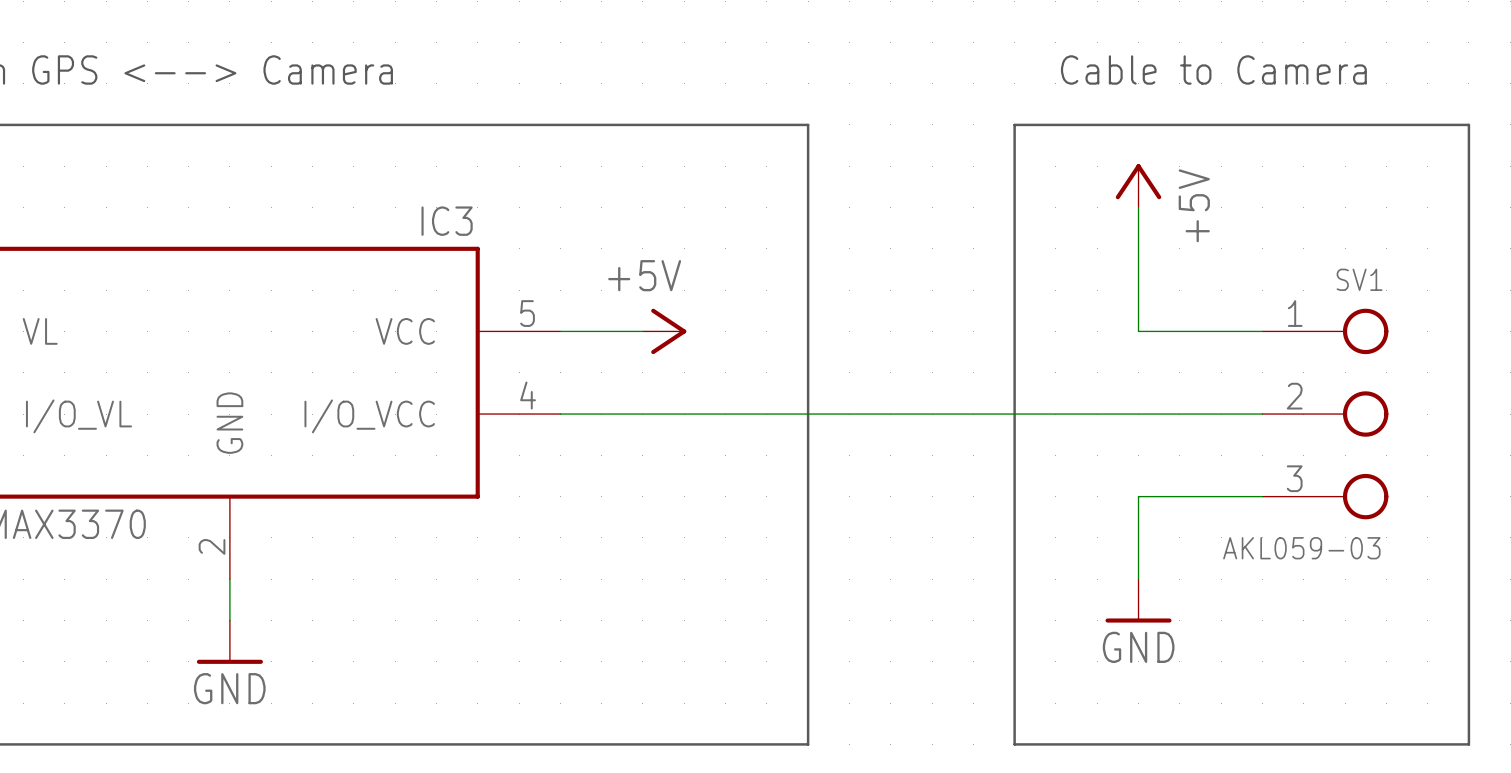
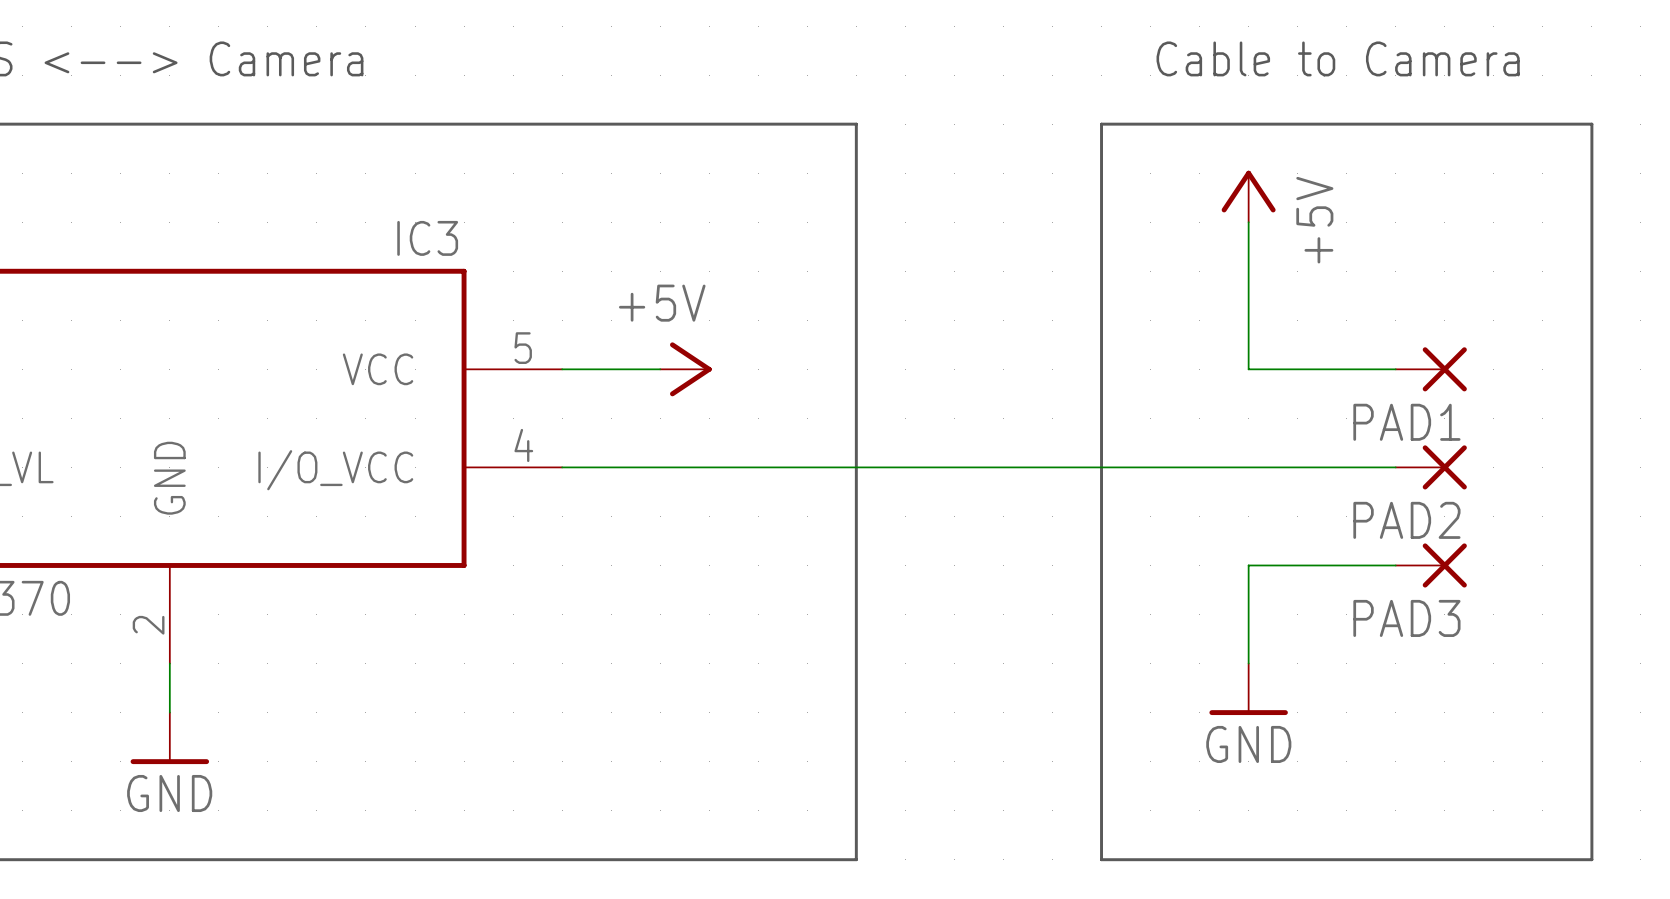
line: (1427, 124) (1468, 124) (1468, 744) (1427, 744) -> (1591, 124) (1591, 859)
PAD1: none -> (1431, 369)
PAD2: none -> (1431, 467)
SV1: AKL059-03 (1325, 414) -> none
PAD3: none -> (1431, 565)

